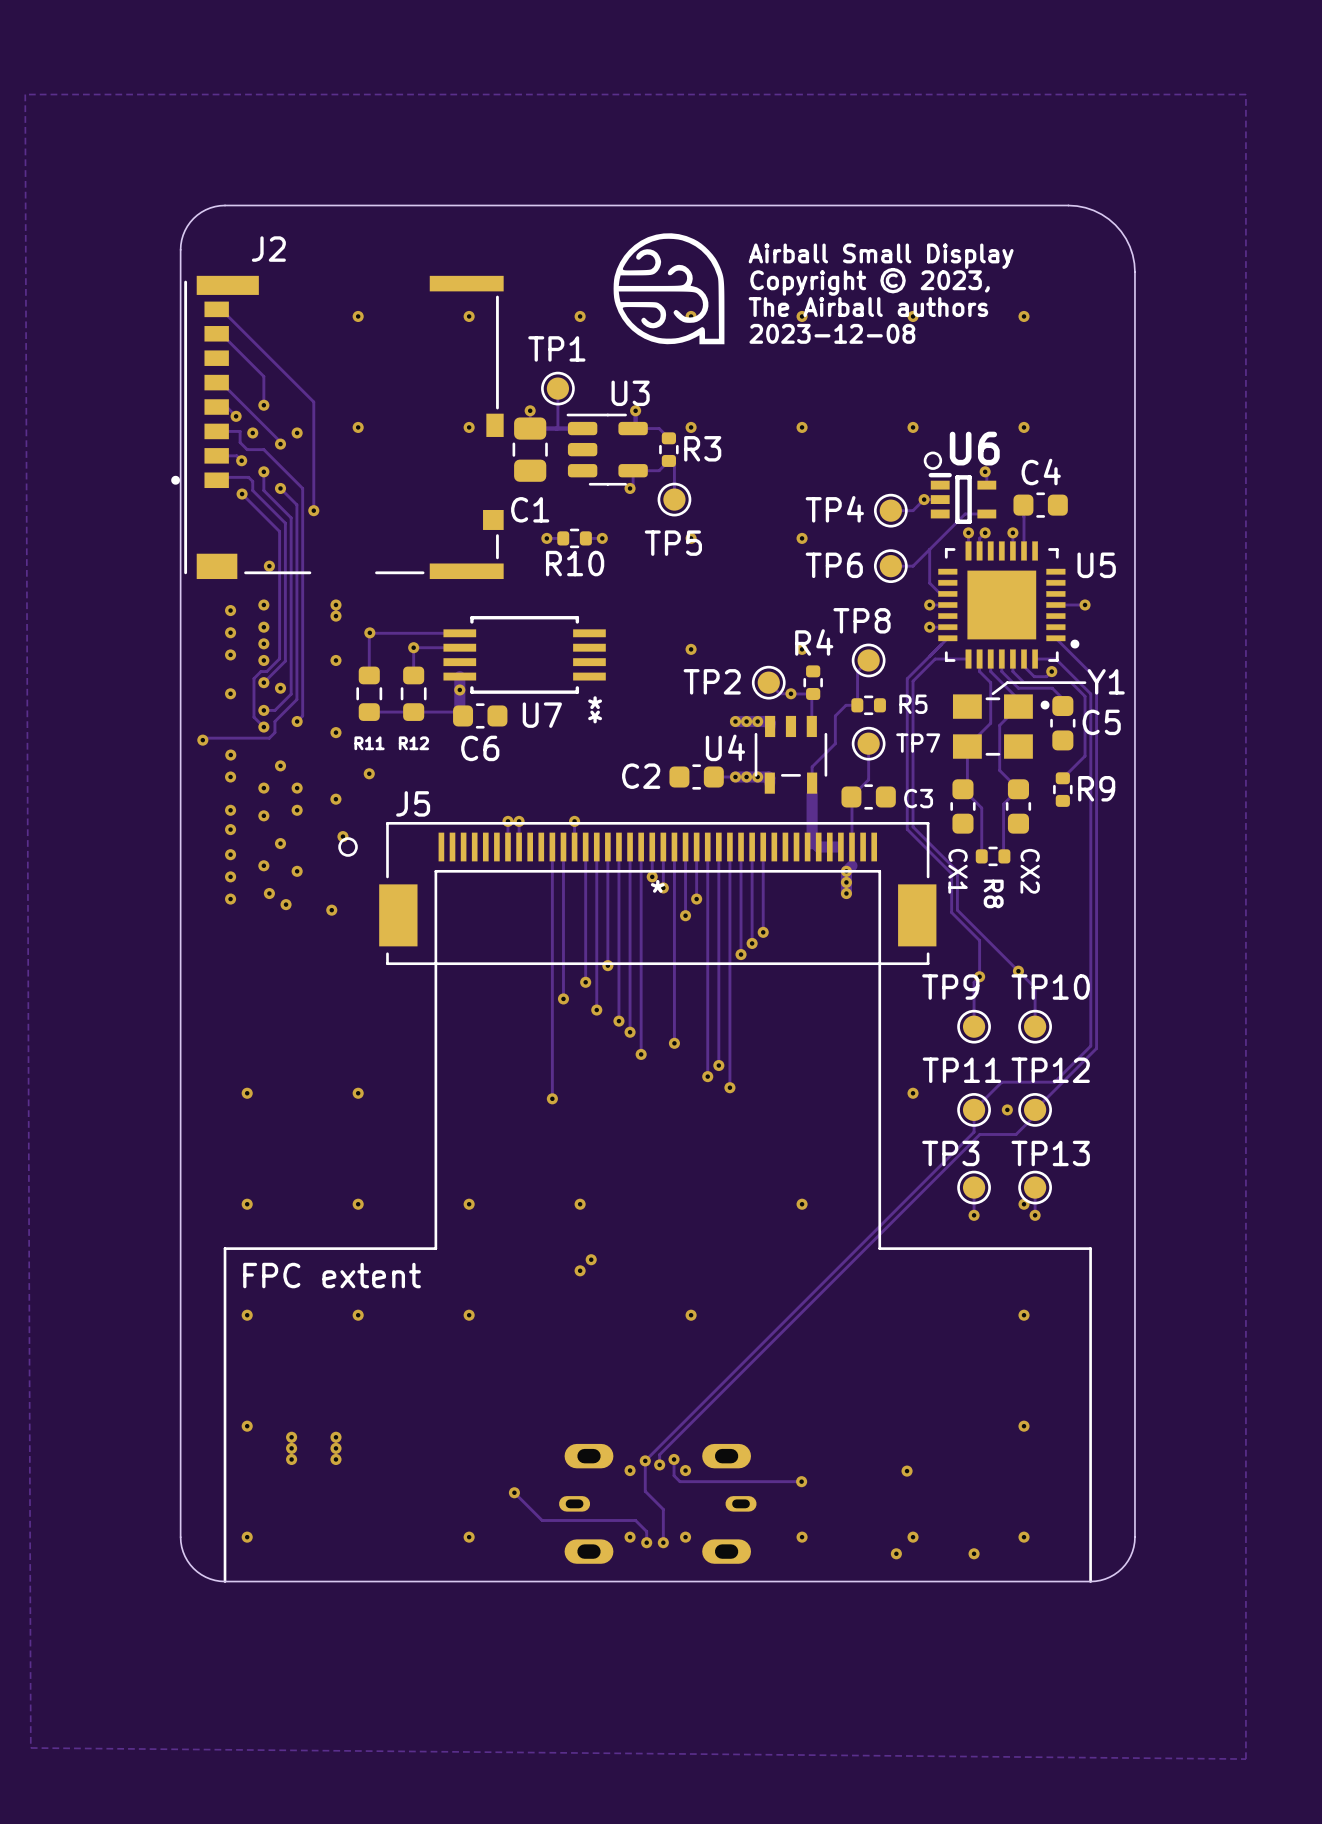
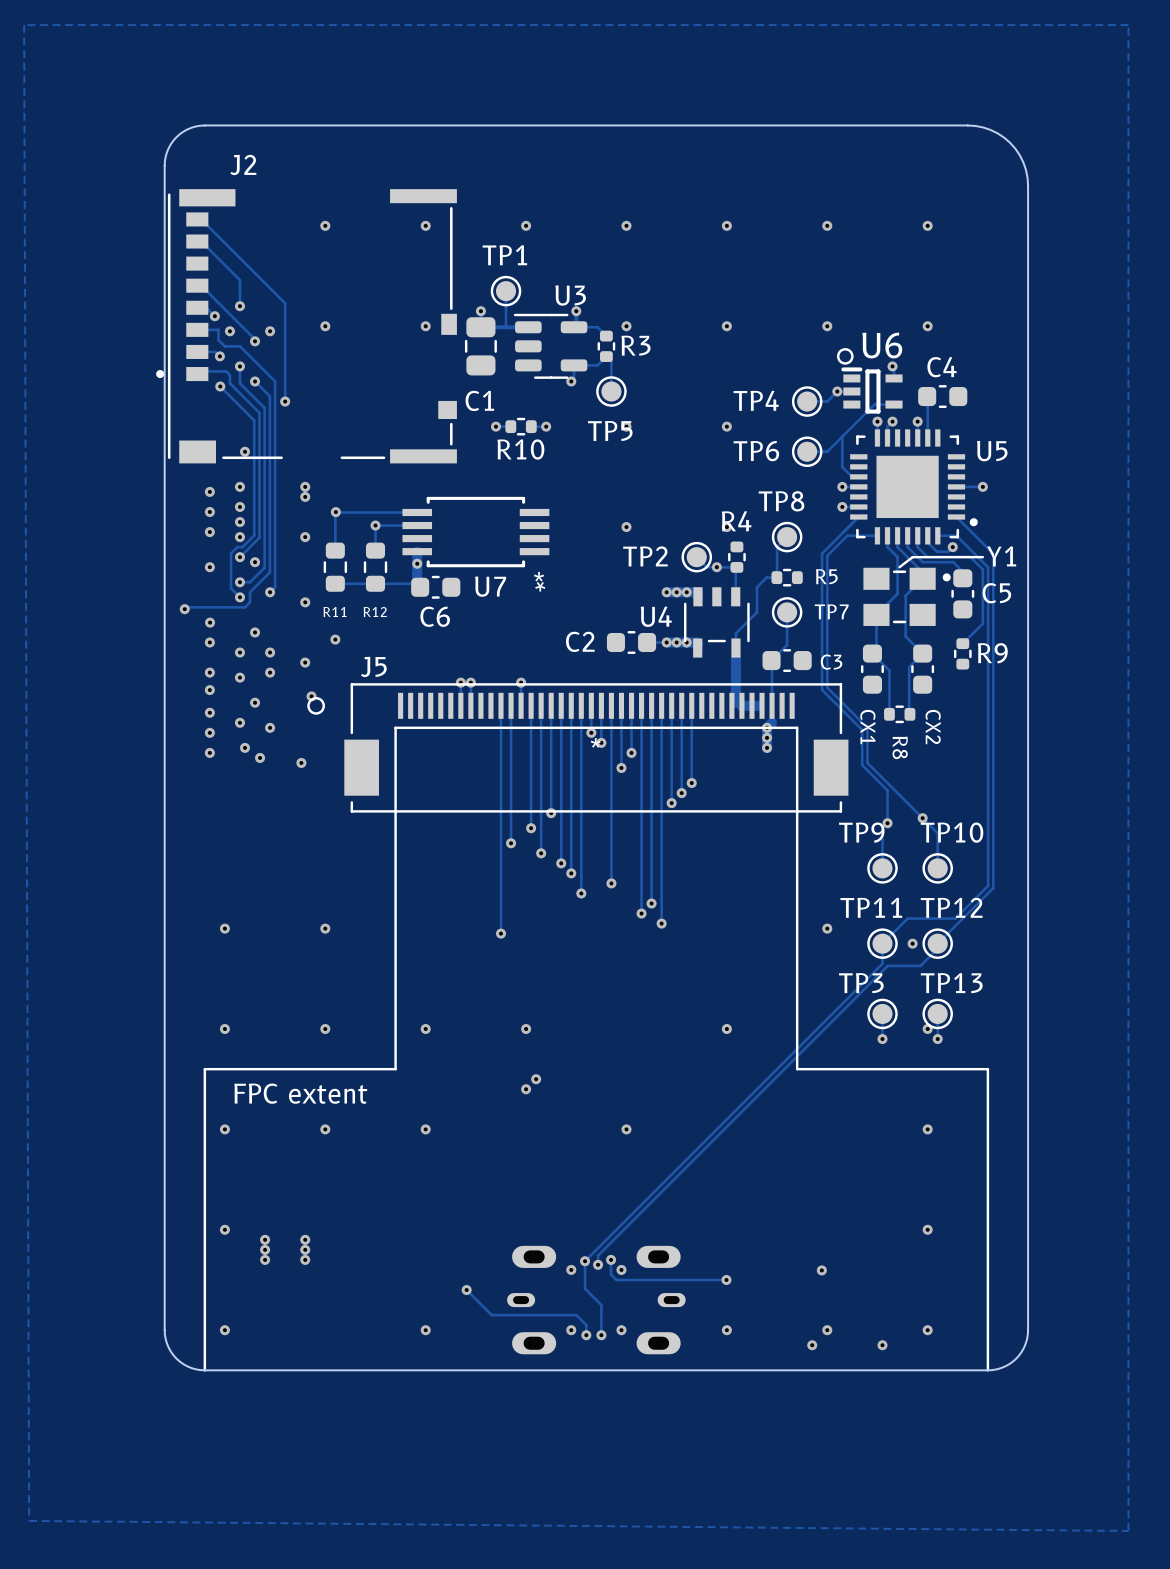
drawing: [613, 233, 725, 345] -> none
text: Airball Small Display (881, 256) -> none
text: Copyright © 2023, (870, 281) -> none
text: The Airball authors (868, 307) -> none
text: 2023-12-08 (832, 333) -> none

